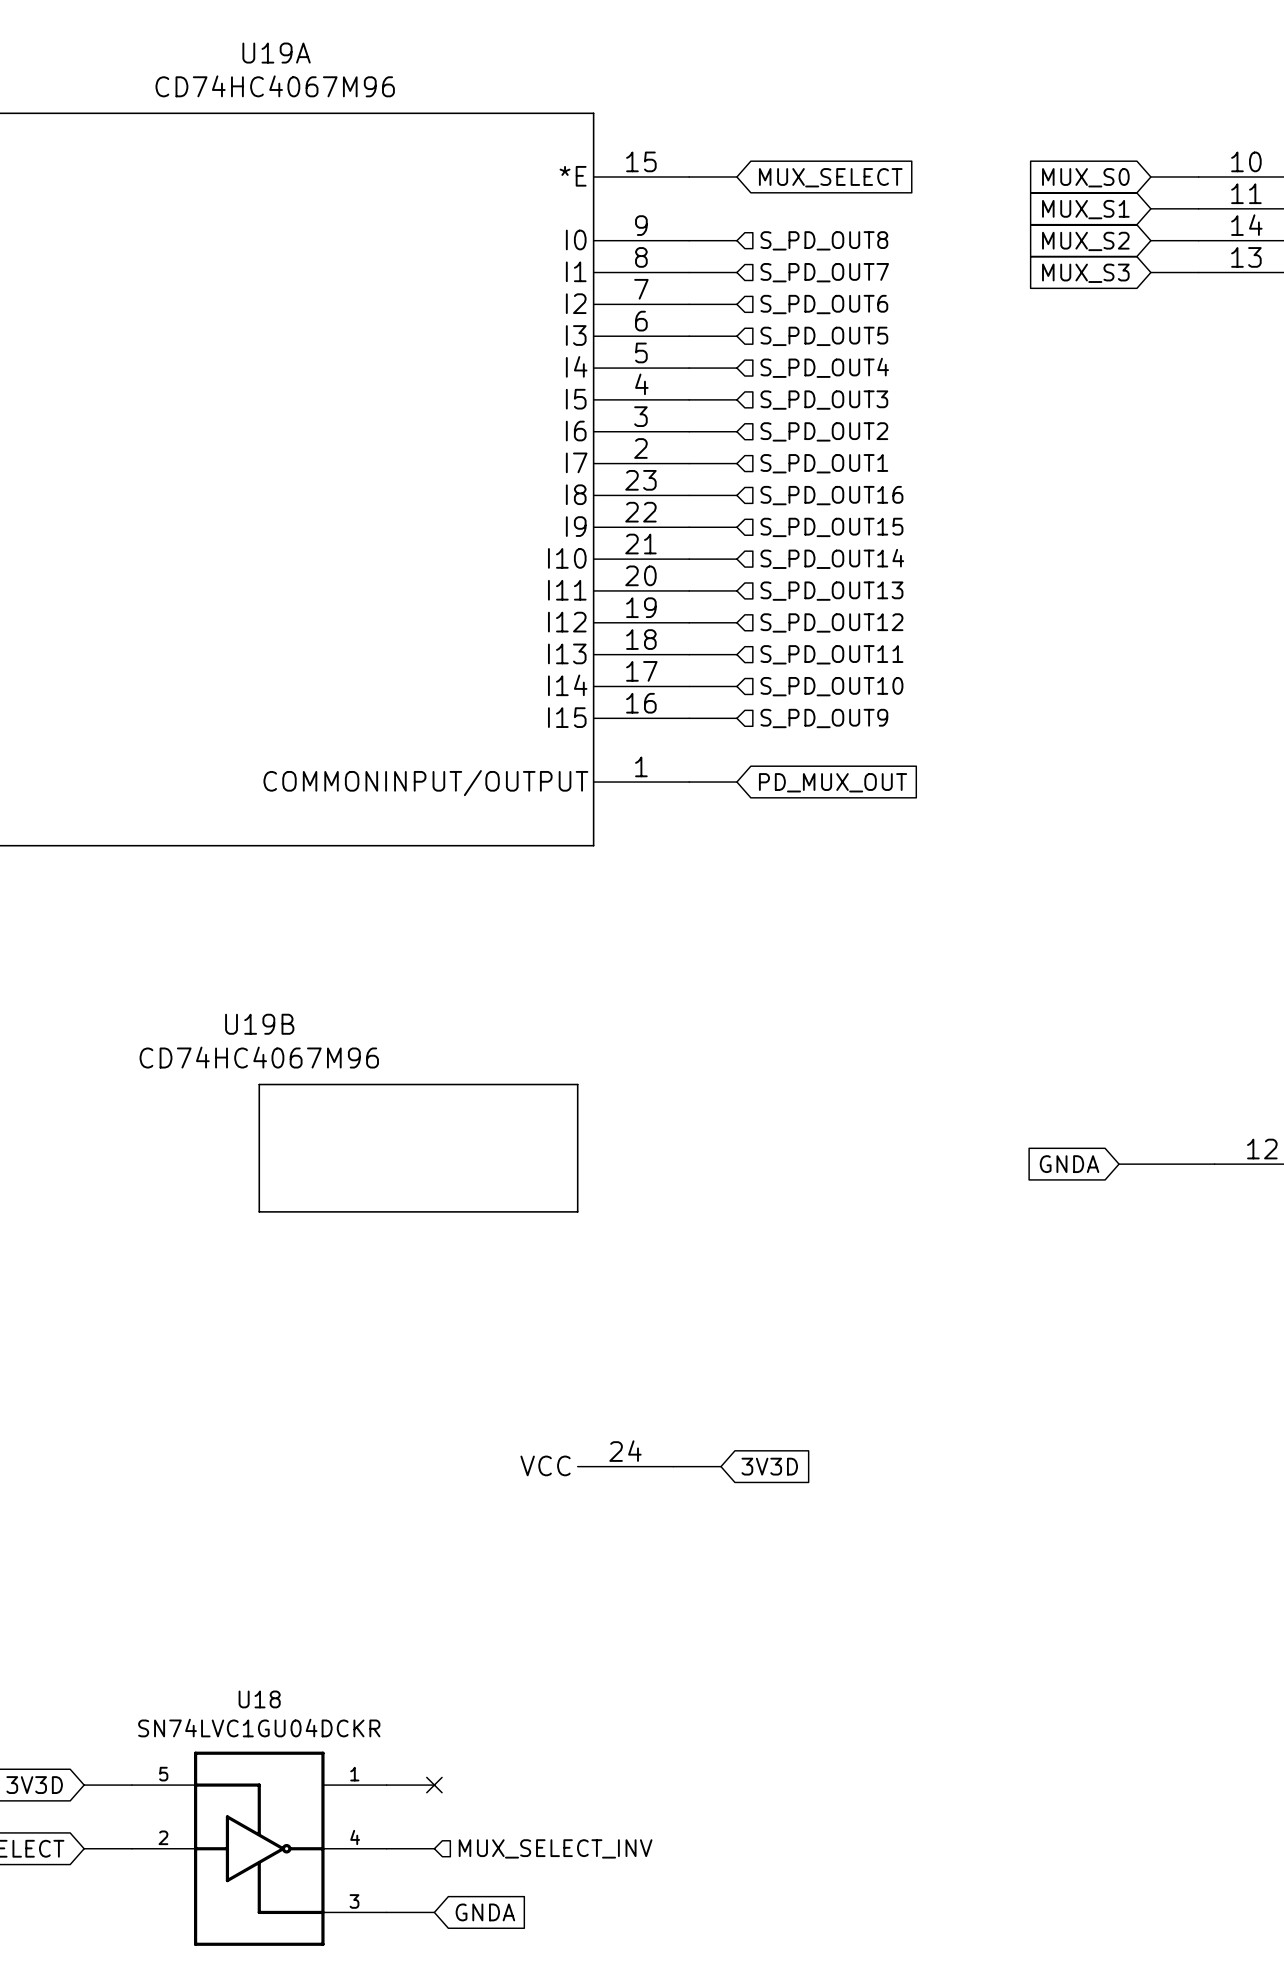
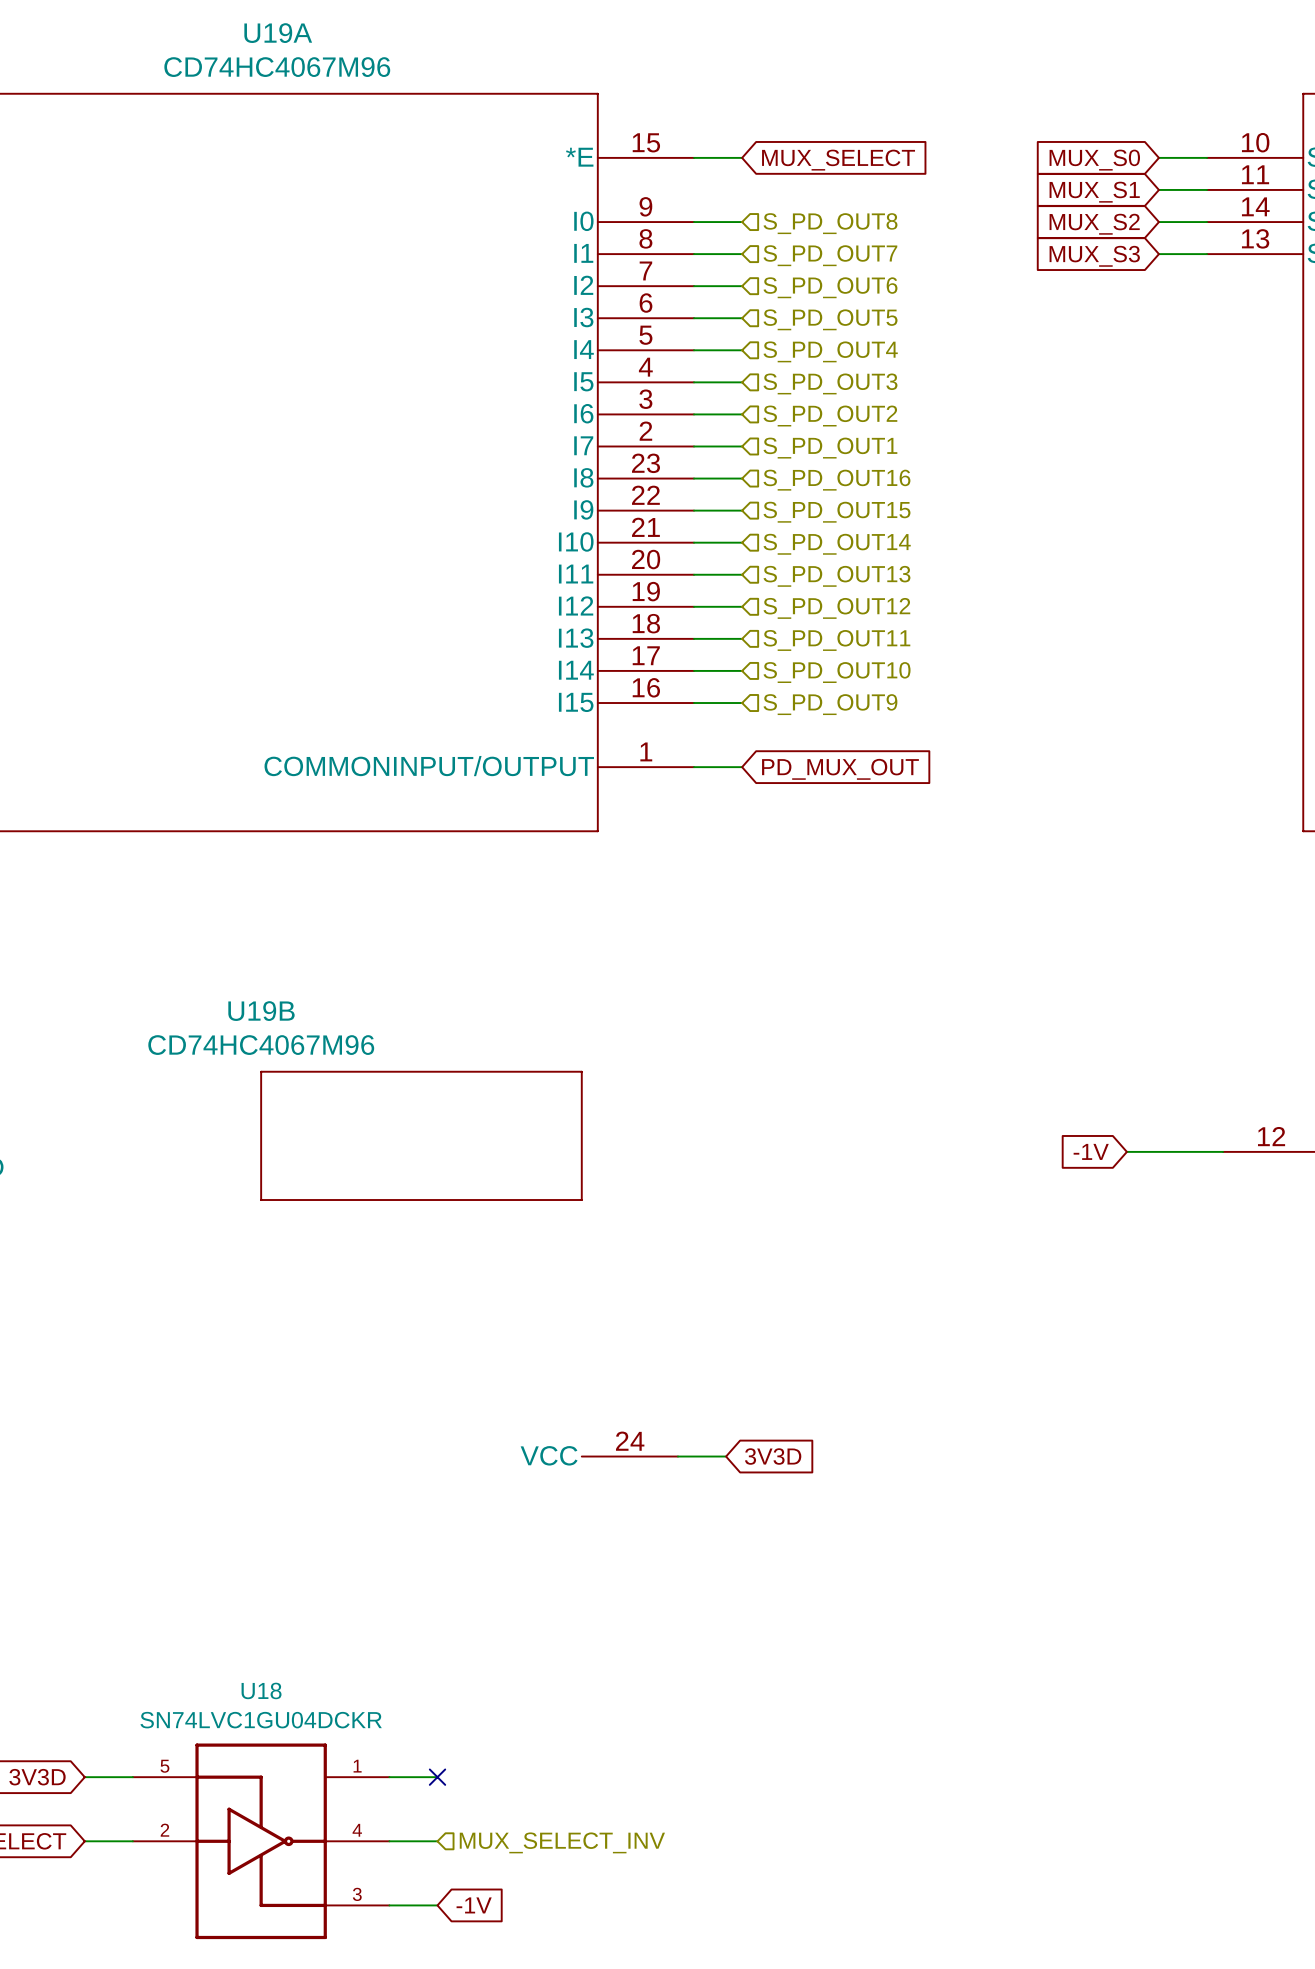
global label: GNDA (1069, 1164) -> -1V (1091, 1151)
global label: GNDA (485, 1912) -> -1V (474, 1905)

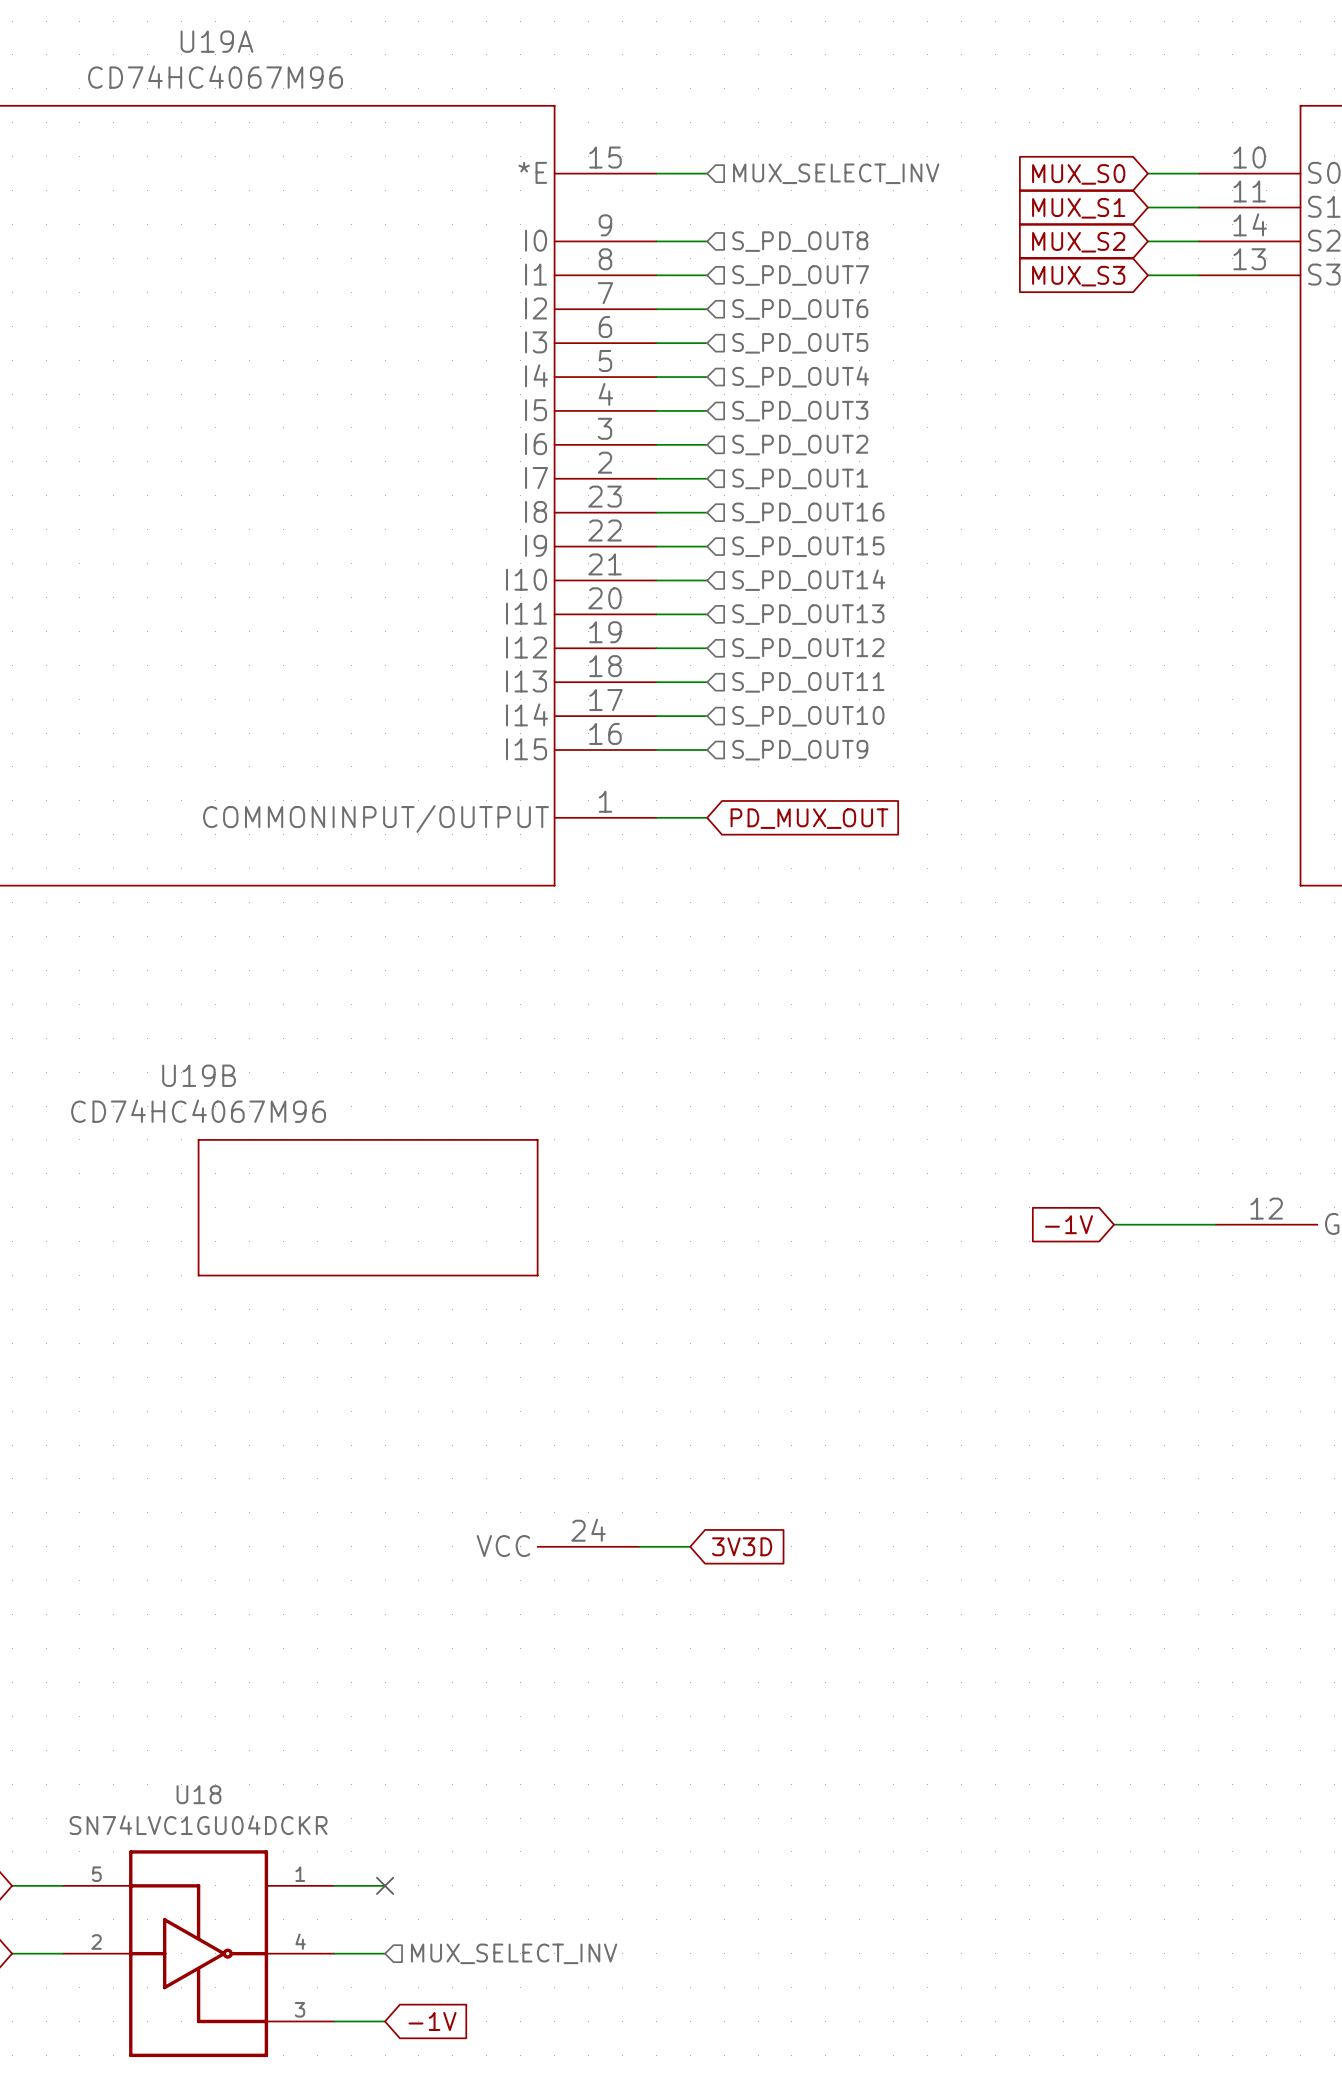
hierarchical label: none -> MUX_SELECT_INV (836, 173)
global label: MUX_SELECT (838, 160) -> none

